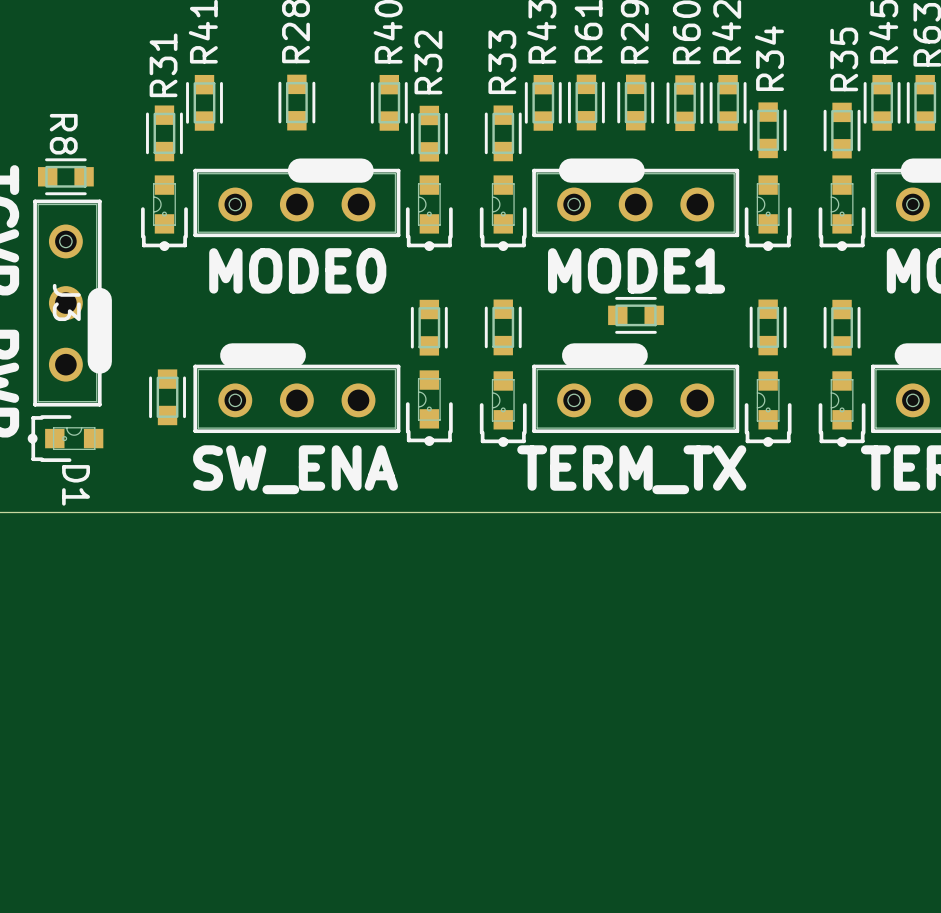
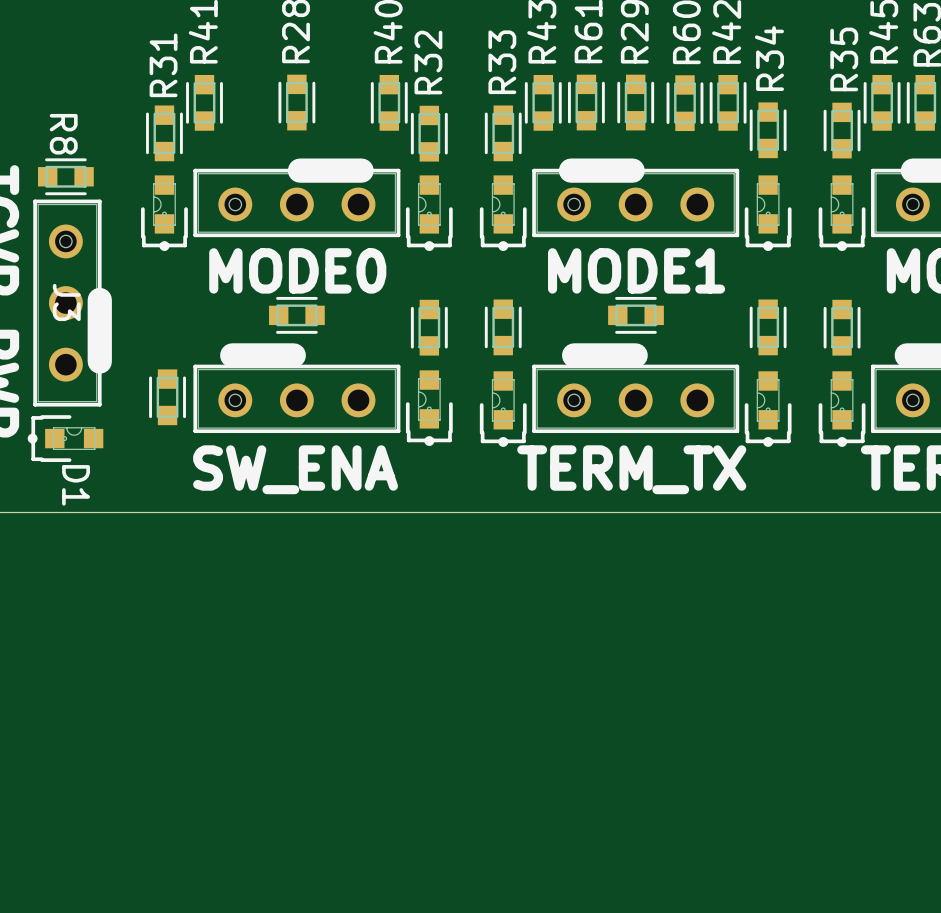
part: none -> (296, 315)

